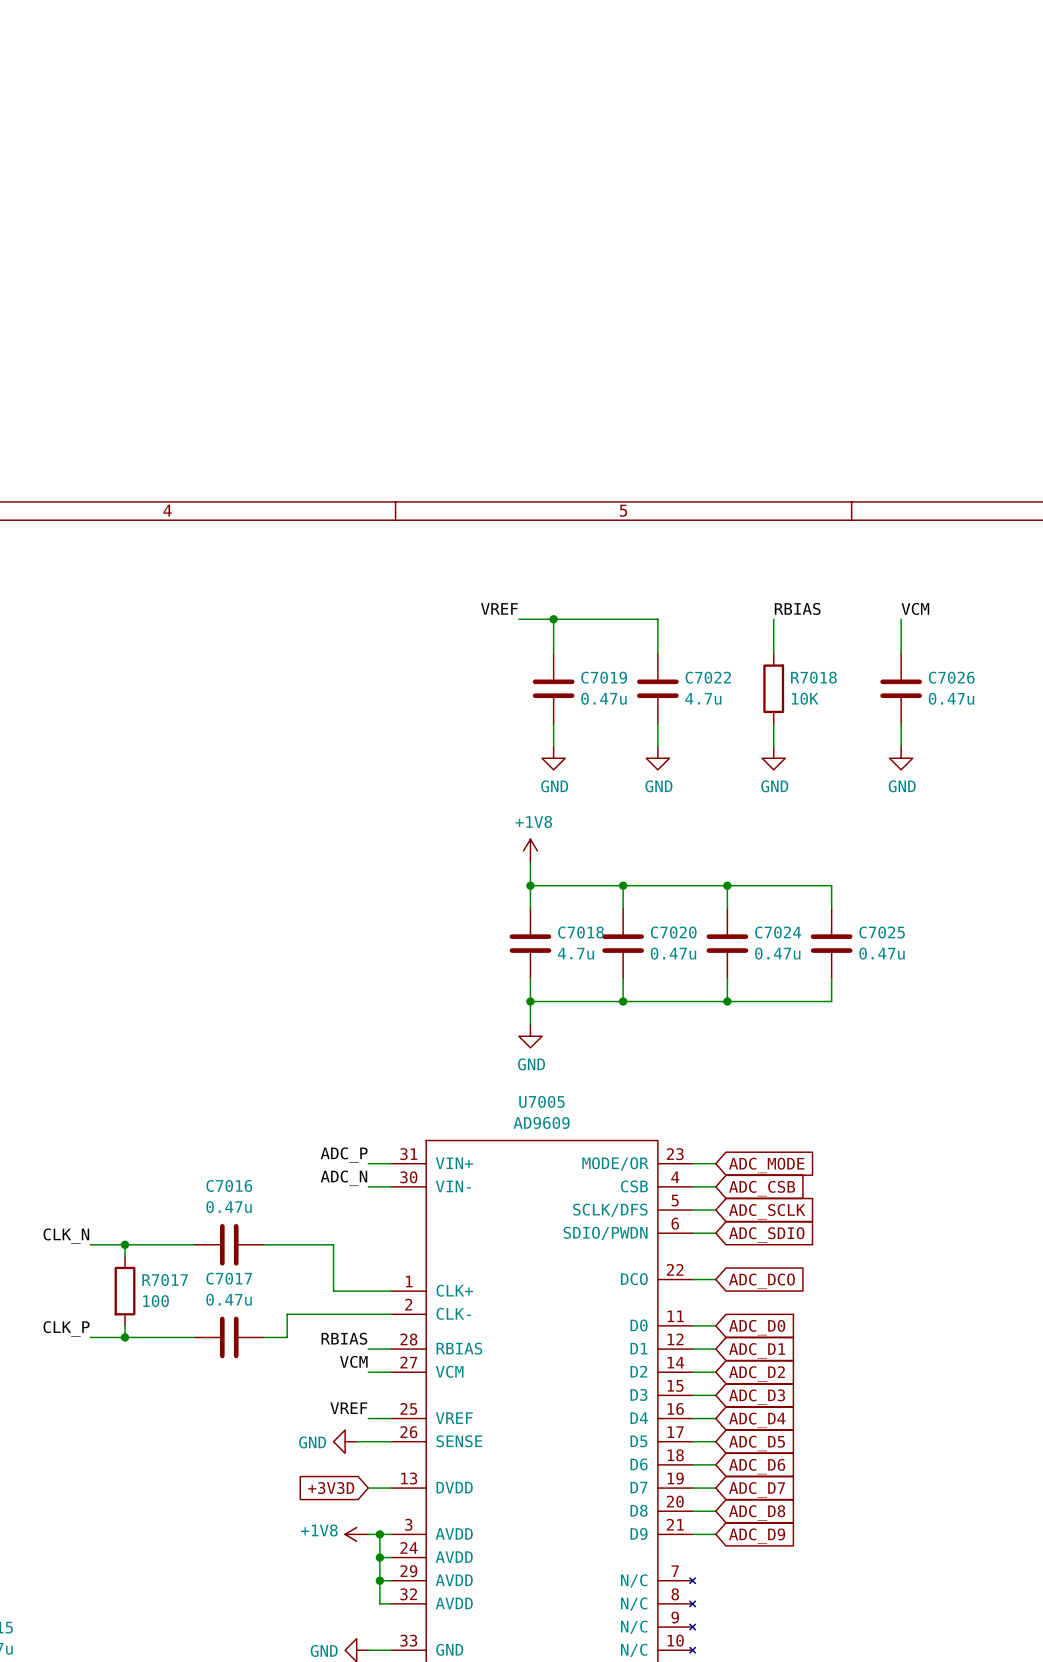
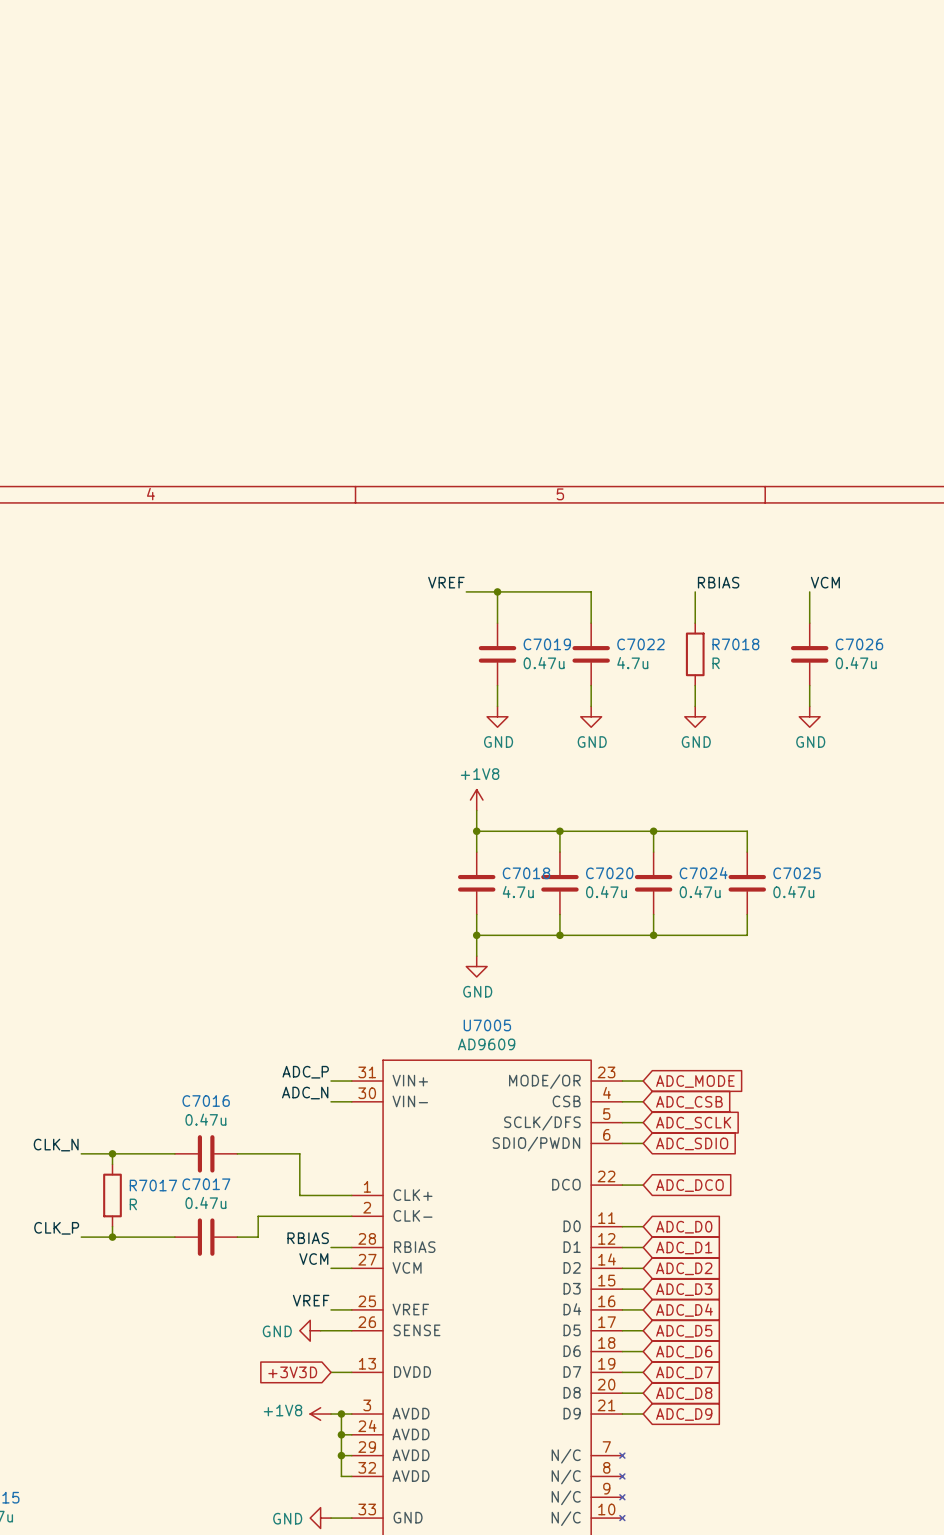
R7018 value: 10K (805, 698) -> R (716, 663)
R7017 value: 100 (156, 1301) -> R (133, 1204)

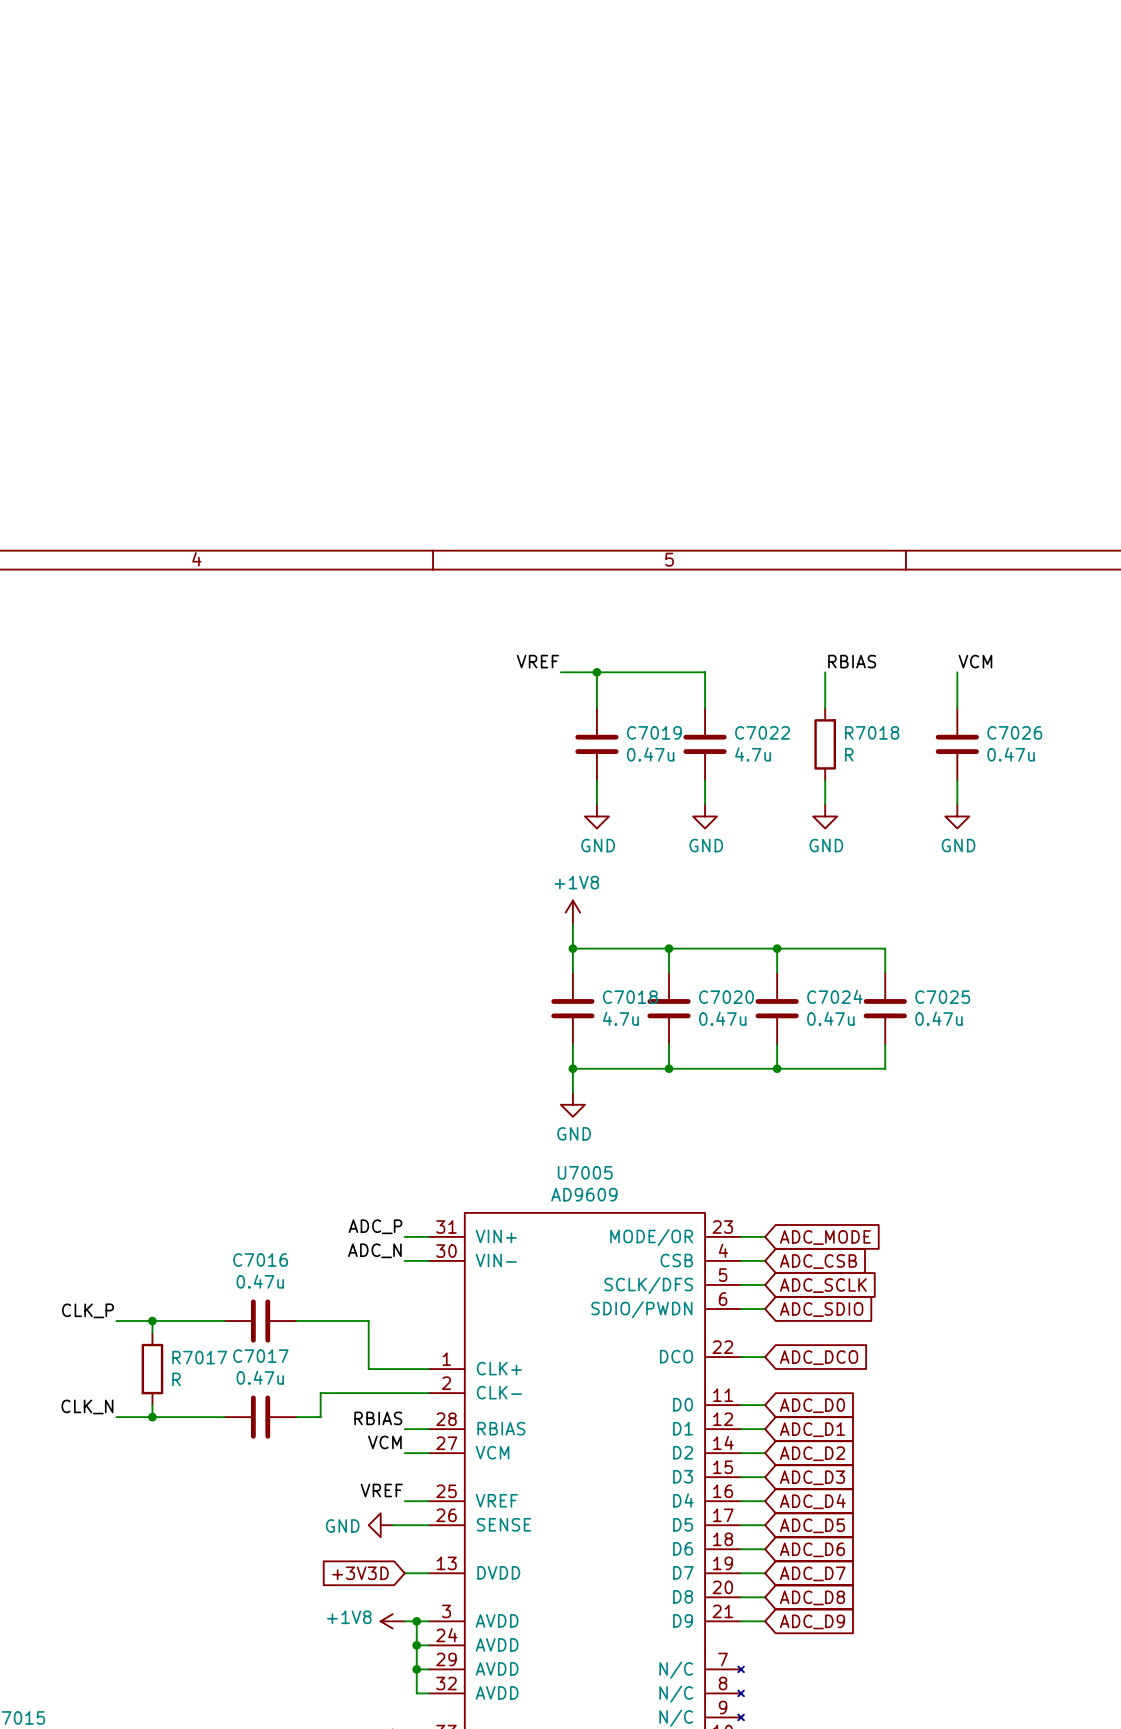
label: CLK_N (56, 1145) -> CLK_P (88, 1310)
label: CLK_P (56, 1228) -> CLK_N (87, 1406)

